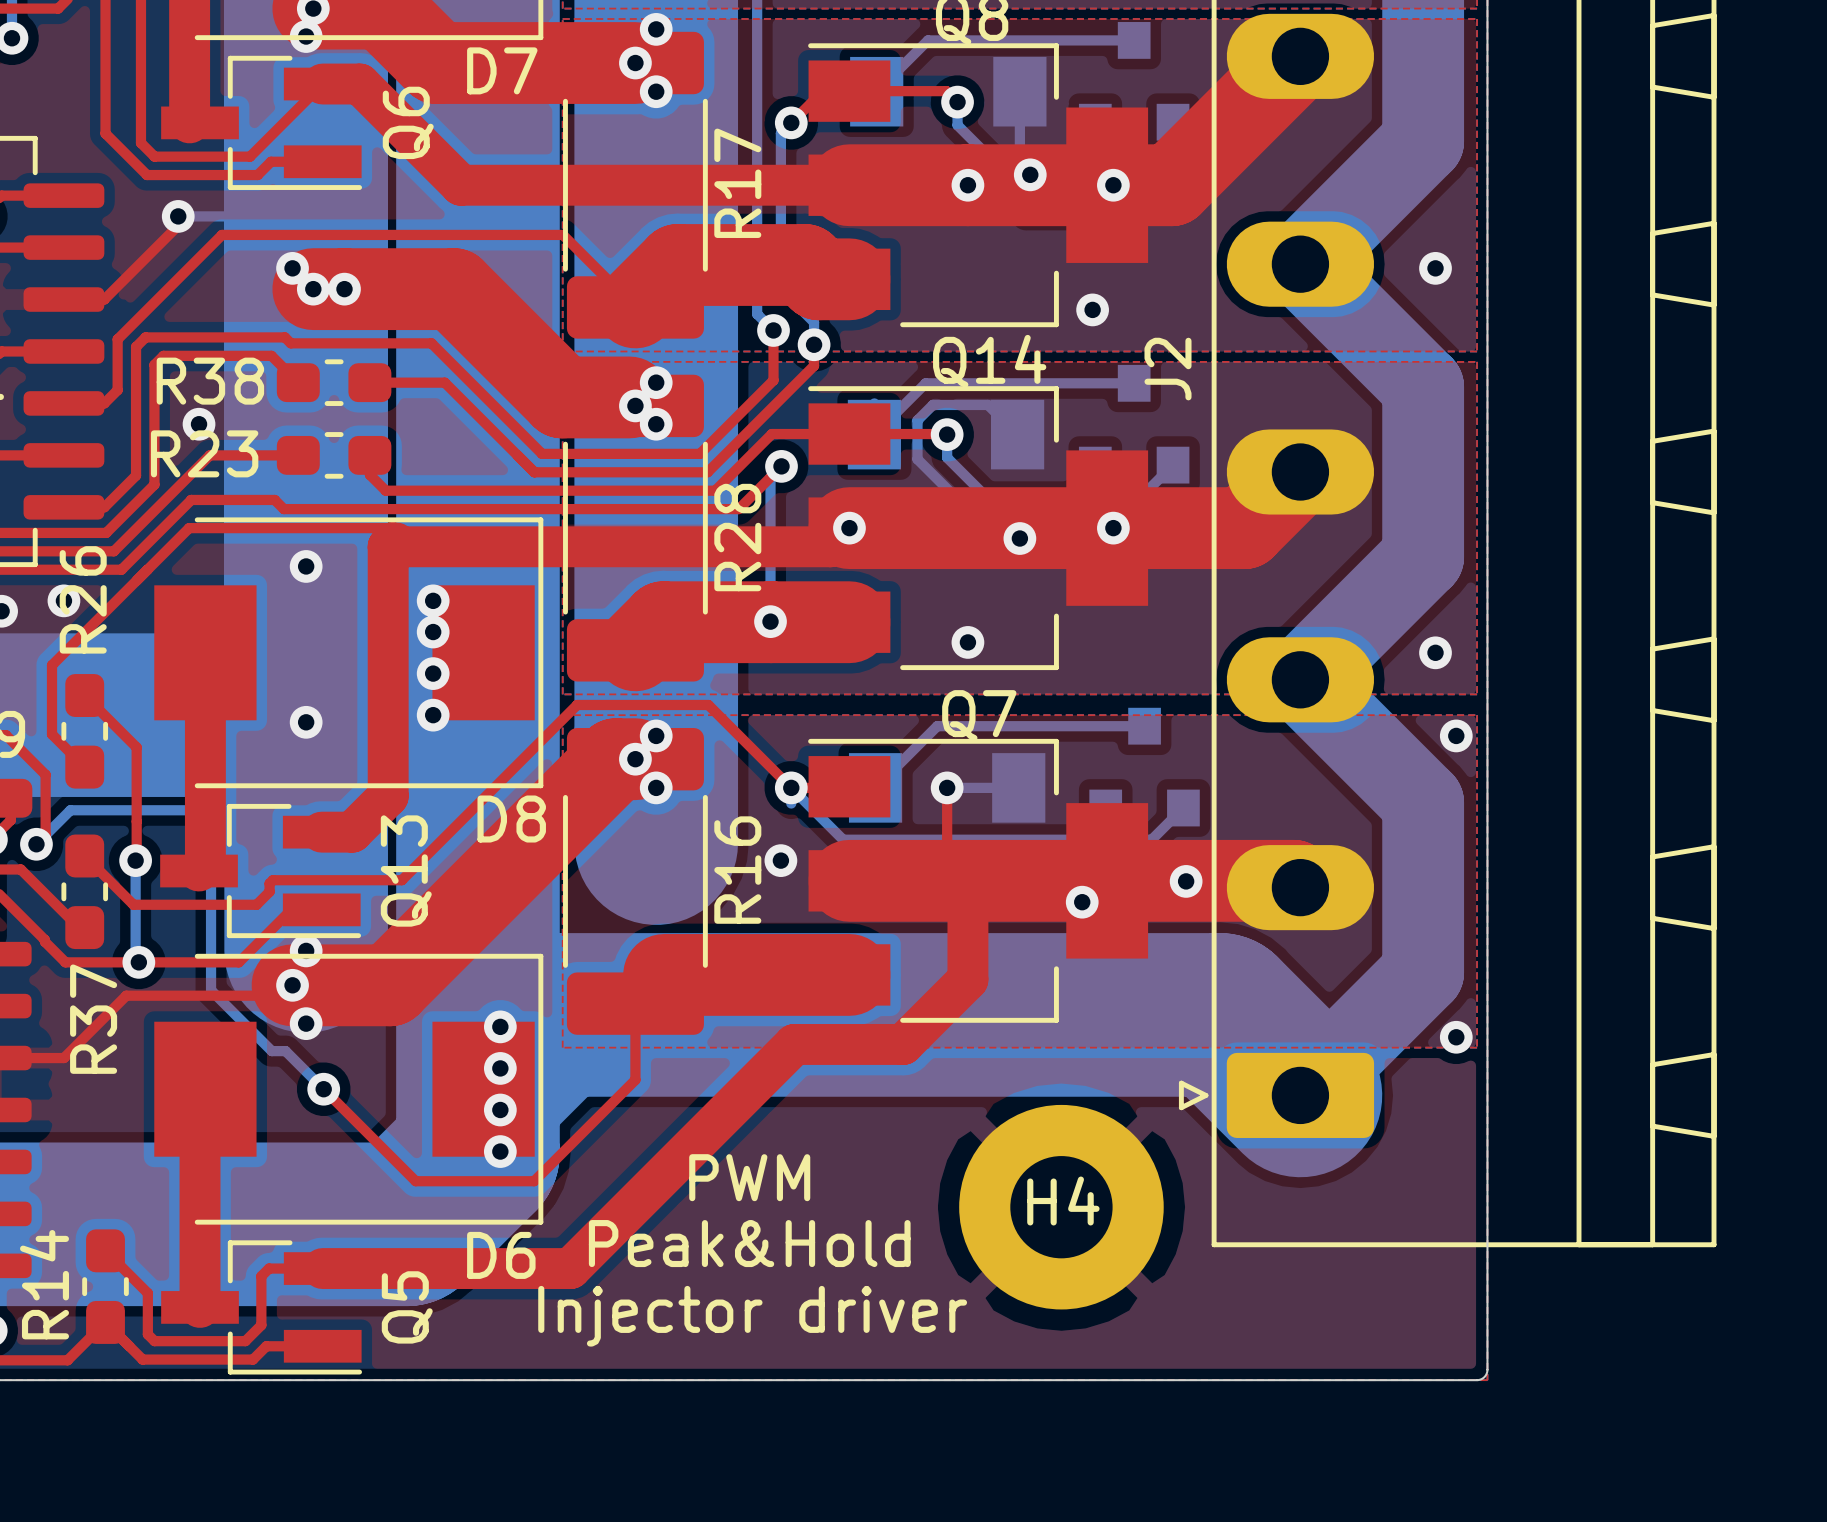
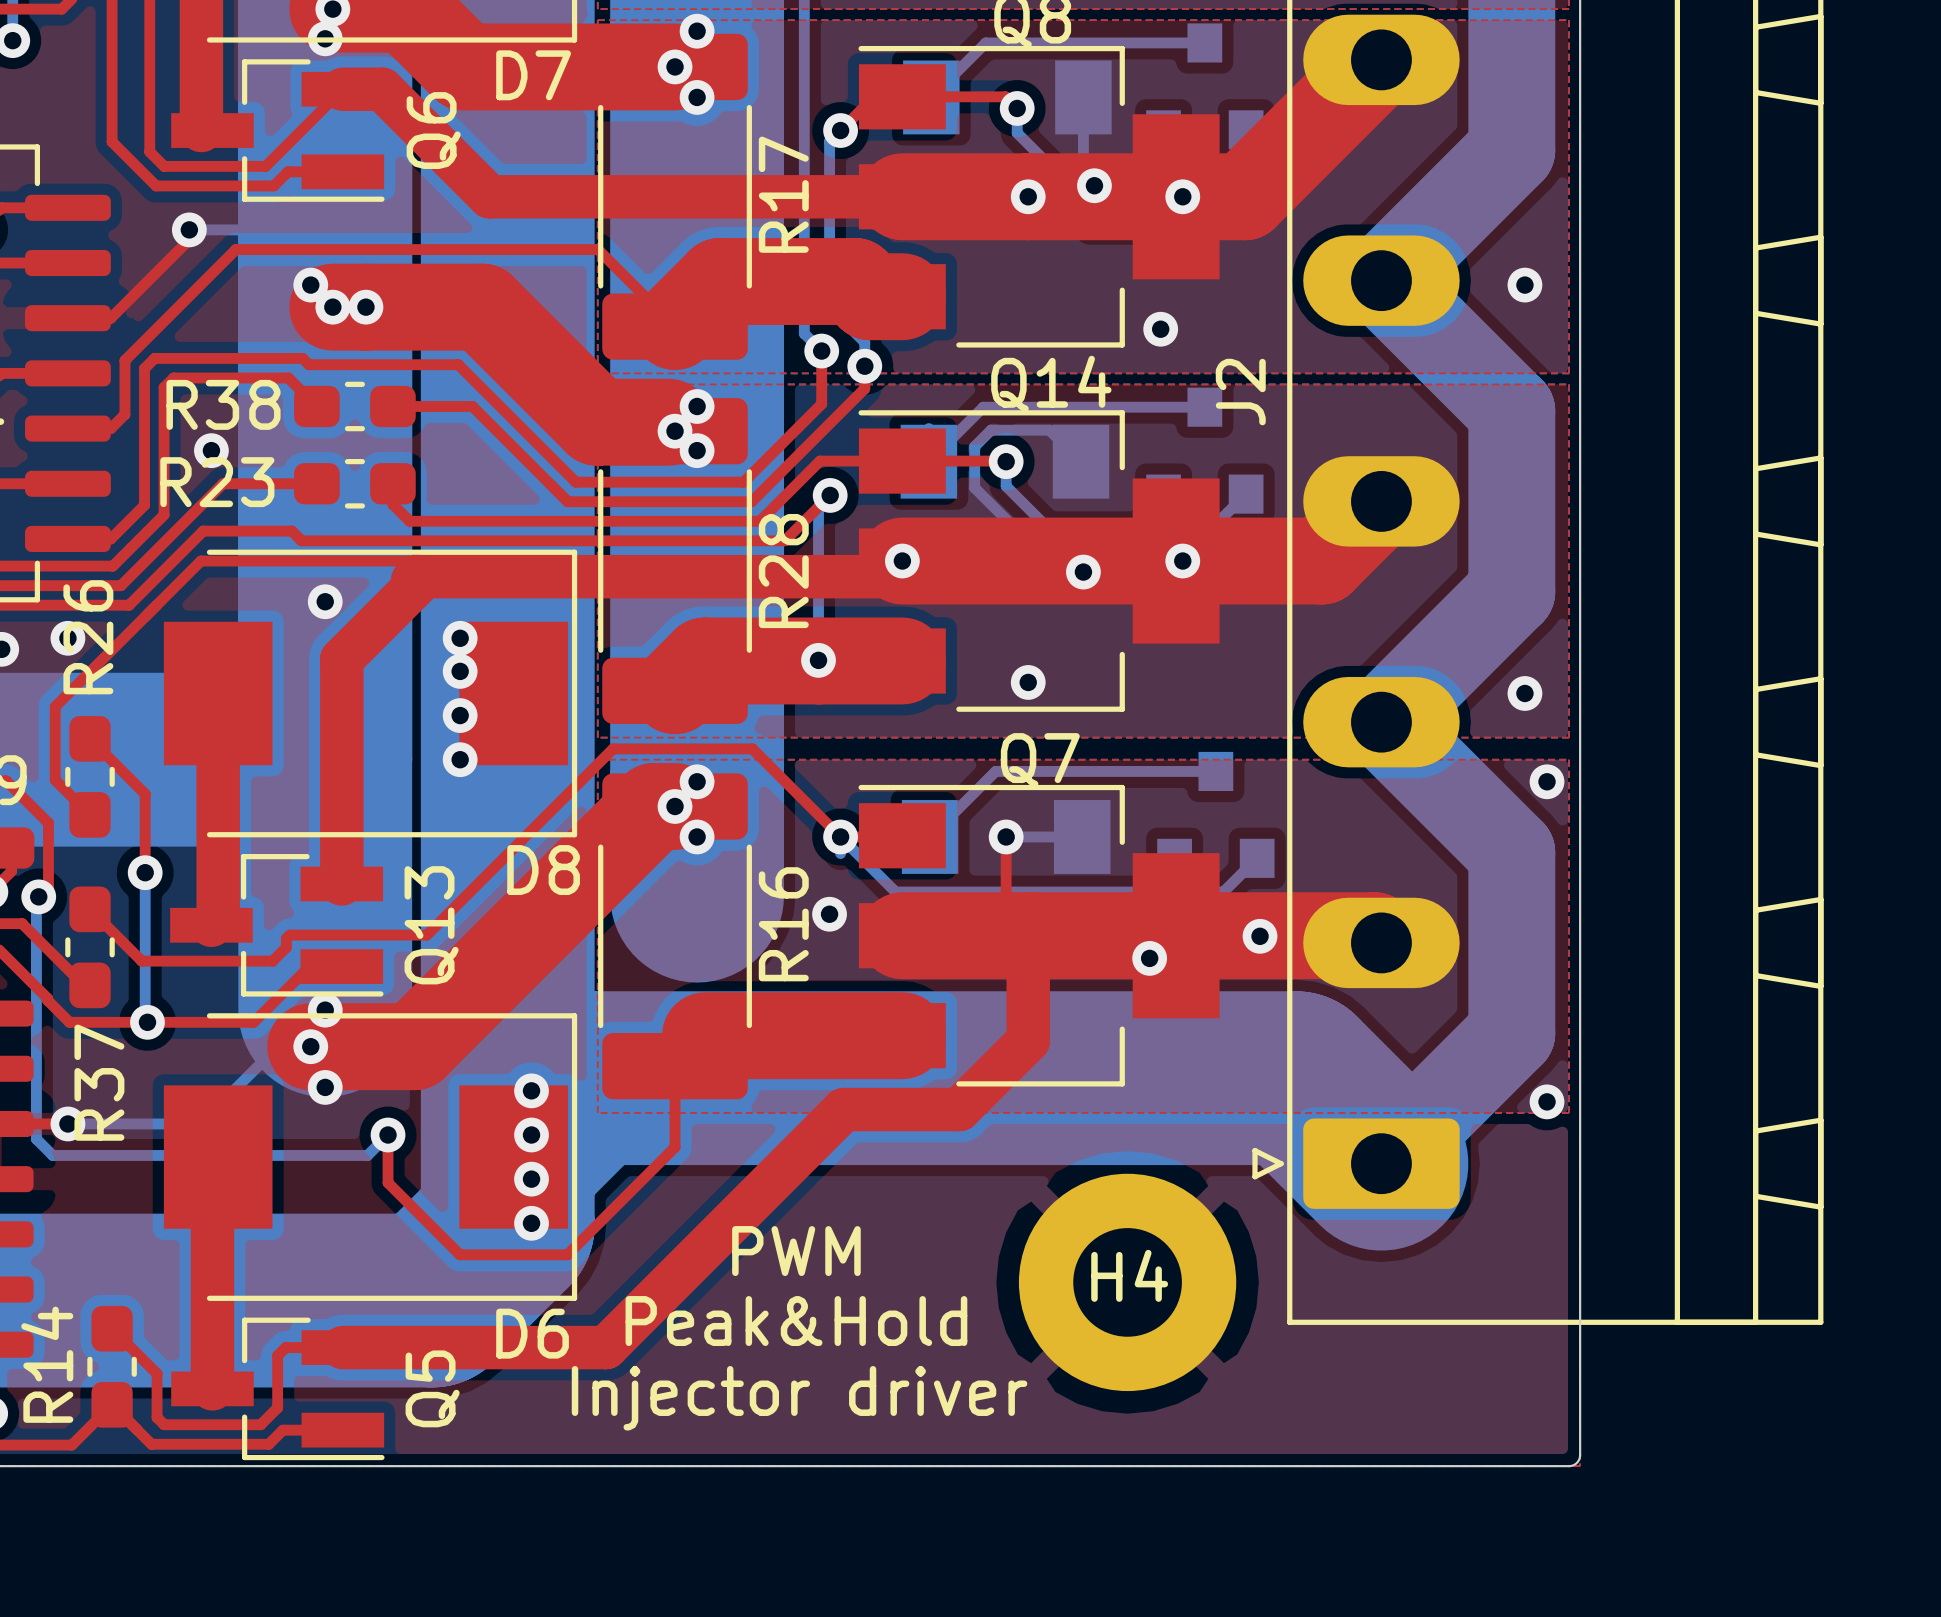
top track: (834, 542) (830, 546) (388, 546) (388, 796) (352, 832) (321, 832) -> (886, 576) (424, 576) (341, 659) (341, 884)
via: (306, 722) -> none
top track: (136, 821) (135, 860) -> none
bottom track: (36, 844) (70, 810) (200, 810) (211, 820) (211, 990) (271, 1051) (285, 1051) (323, 1089) -> (38, 896) (36, 899) (36, 1139) (52, 1155) (367, 1155) (388, 1135)
bottom track: (135, 860) (136, 960) -> (145, 872) (145, 1020)
via position: (135, 860) -> (145, 872)
bottom track: none -> (277, 1046) (200, 1123) (67, 1123)
top track: (292, 985) (282, 995) (126, 995) (63, 1058) -> none
via: none -> (67, 1123)
top track: (323, 1089) (415, 1181) (433, 1181) -> (388, 1135) (388, 1182) (459, 1254)
via position: (323, 1089) -> (388, 1135)

